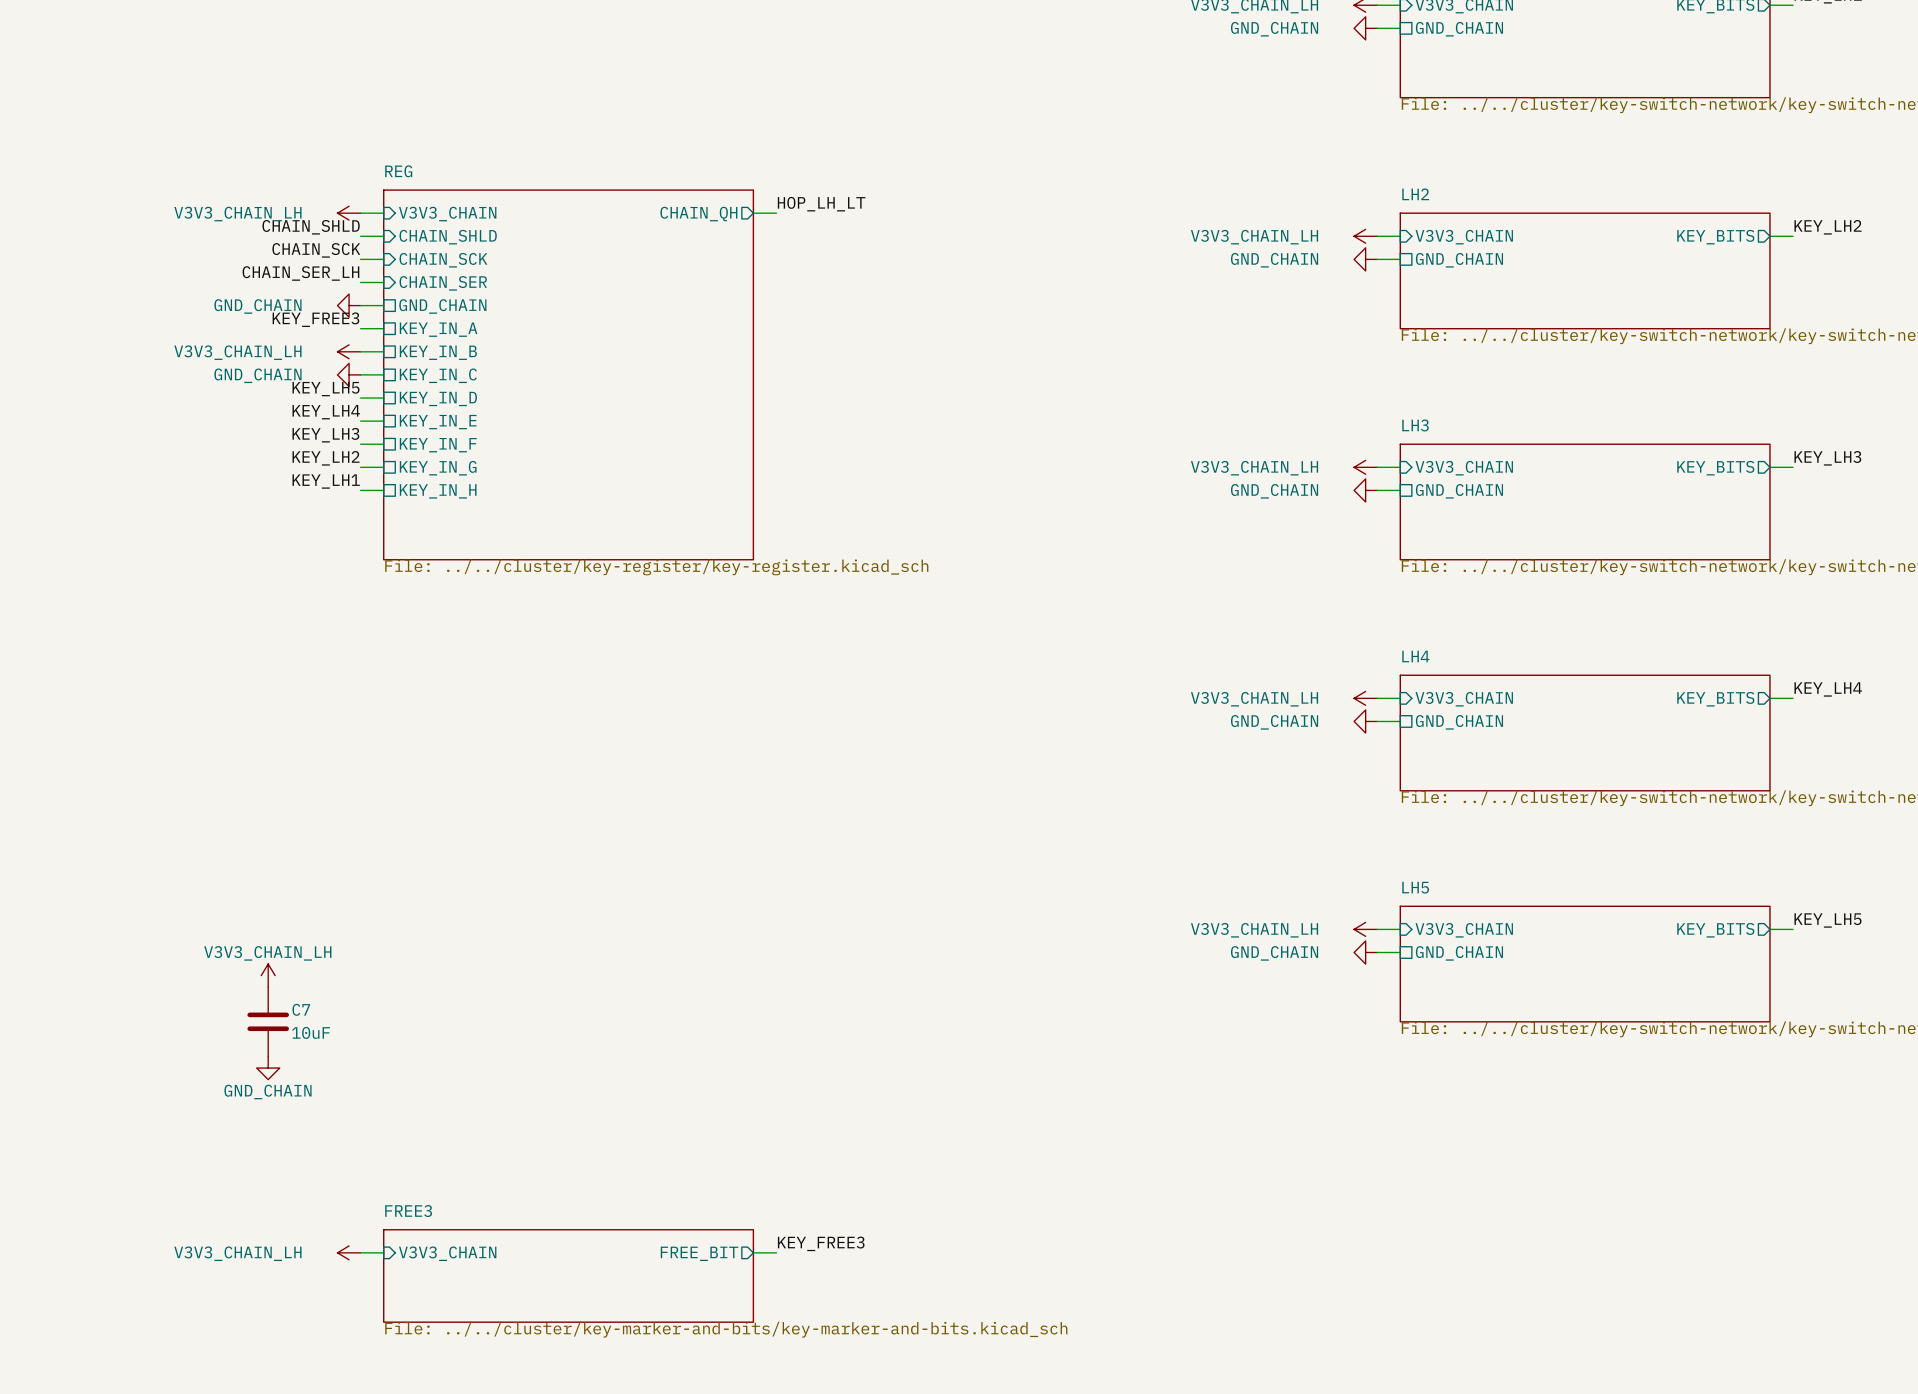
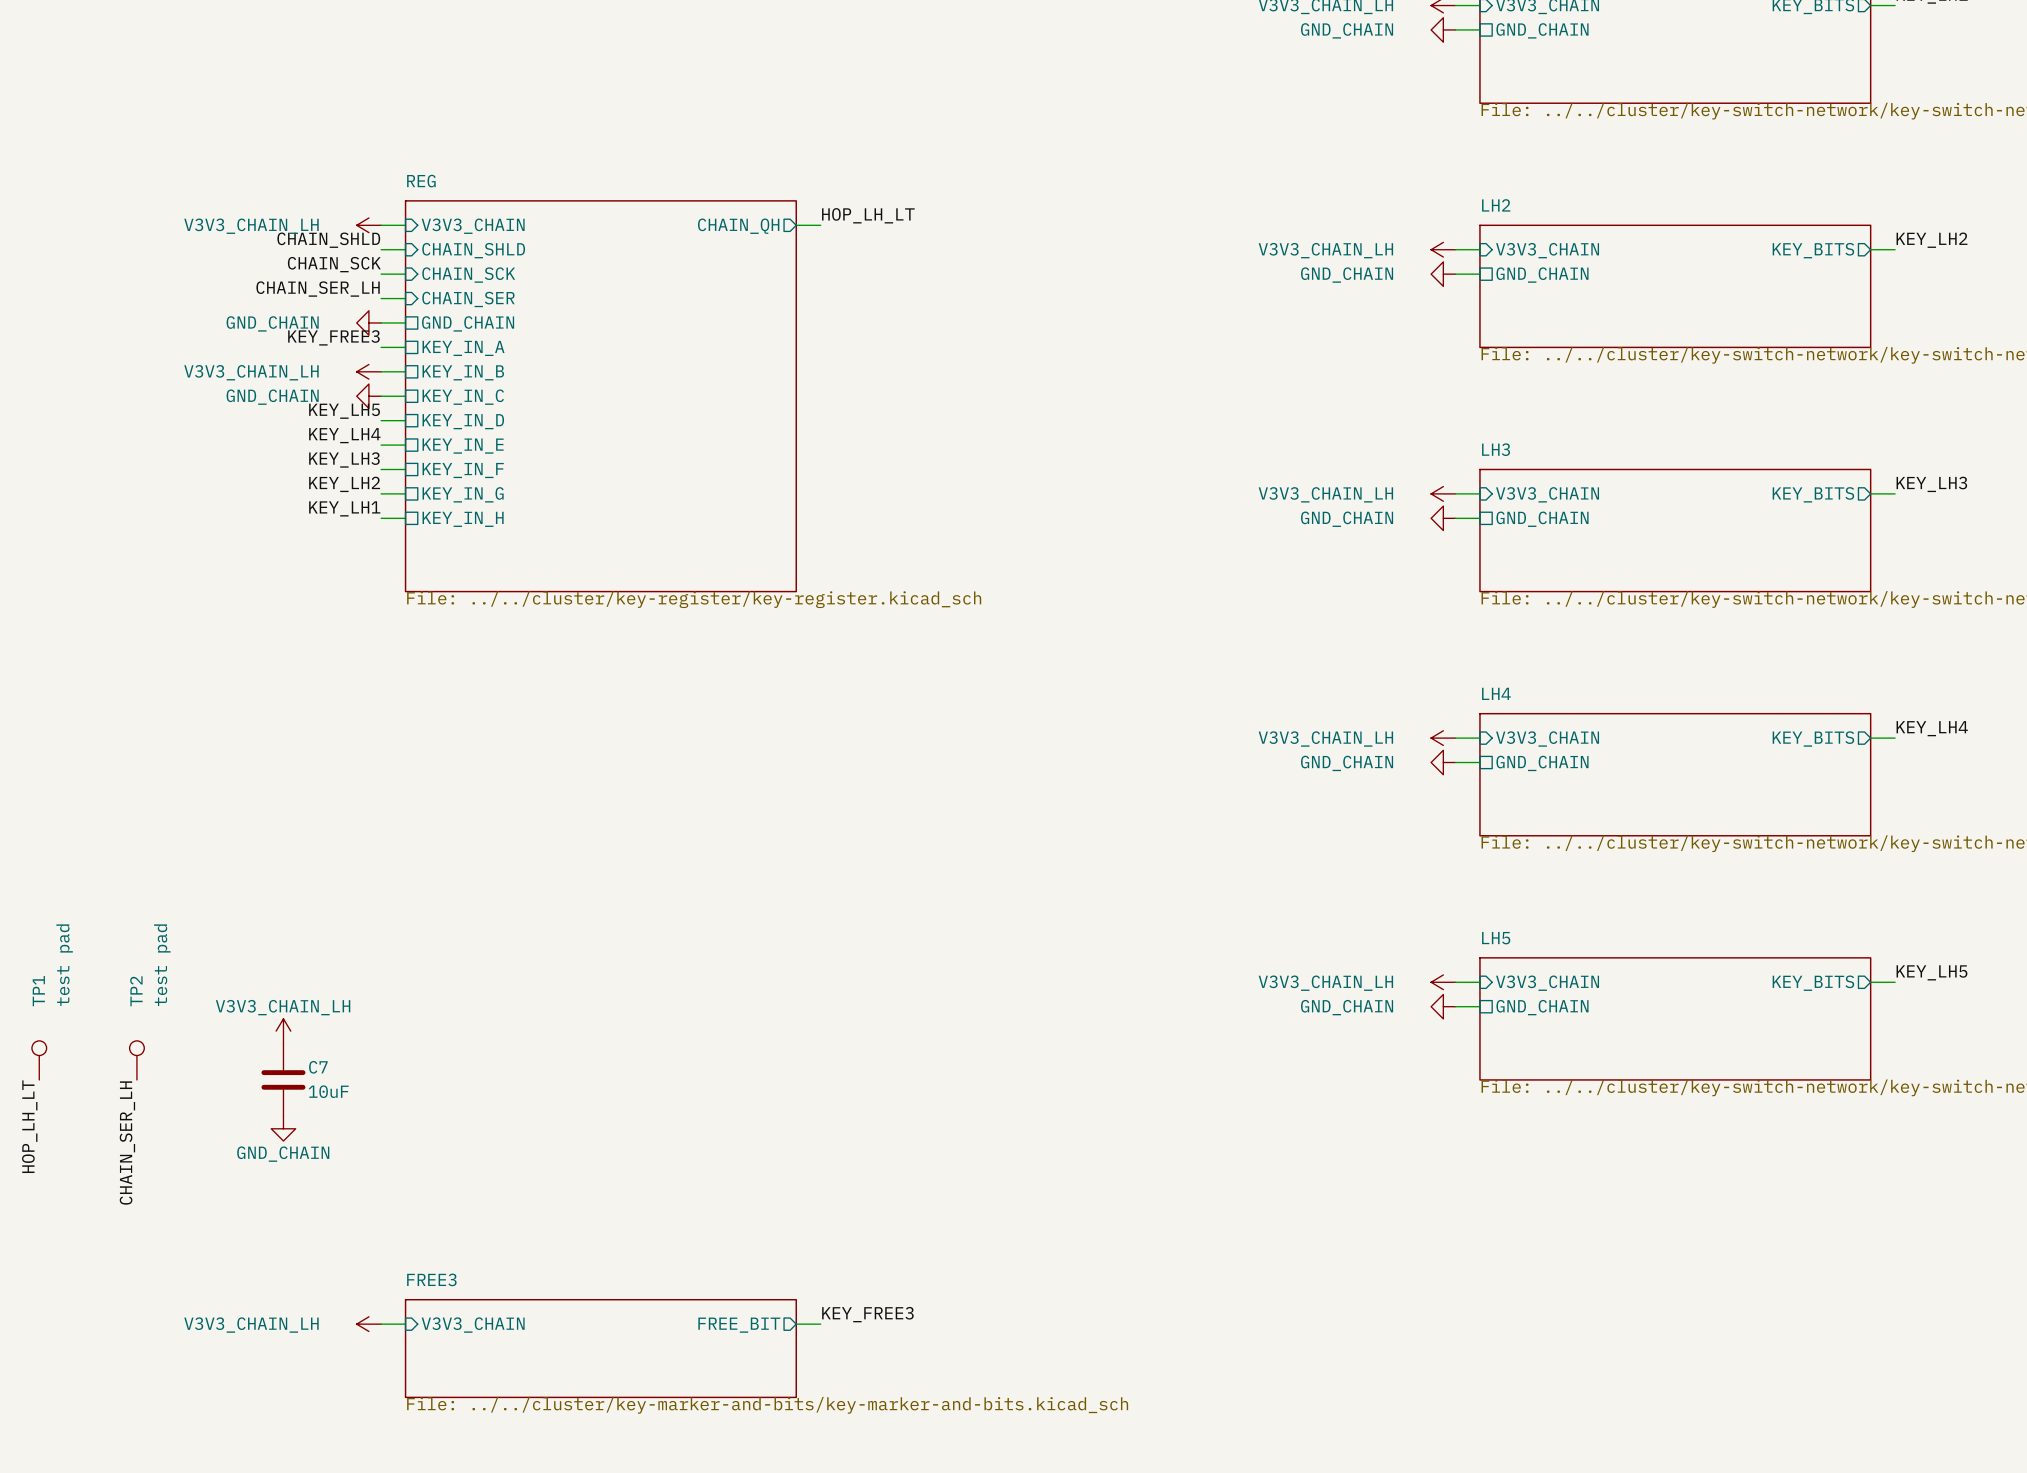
TP1: none -> test pad (39, 1060)
TP2: none -> test pad (136, 1060)
label: none -> HOP_LH_LT (29, 1126)
label: none -> CHAIN_SER_LH (127, 1143)

